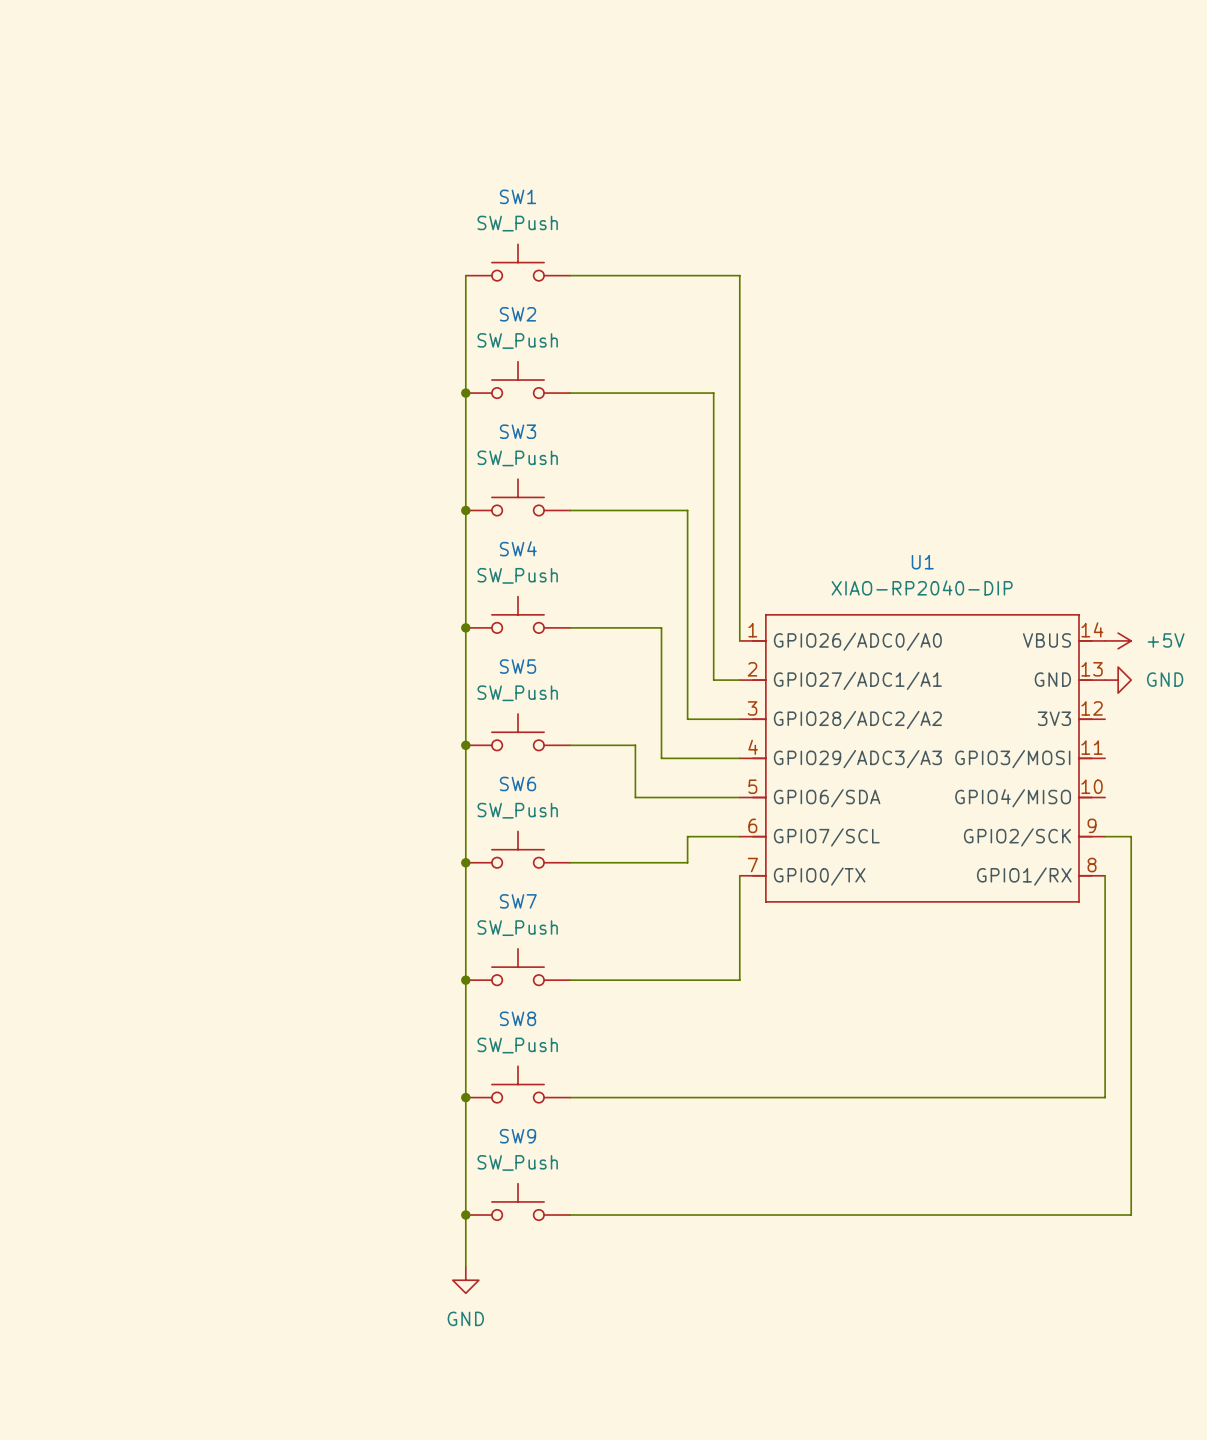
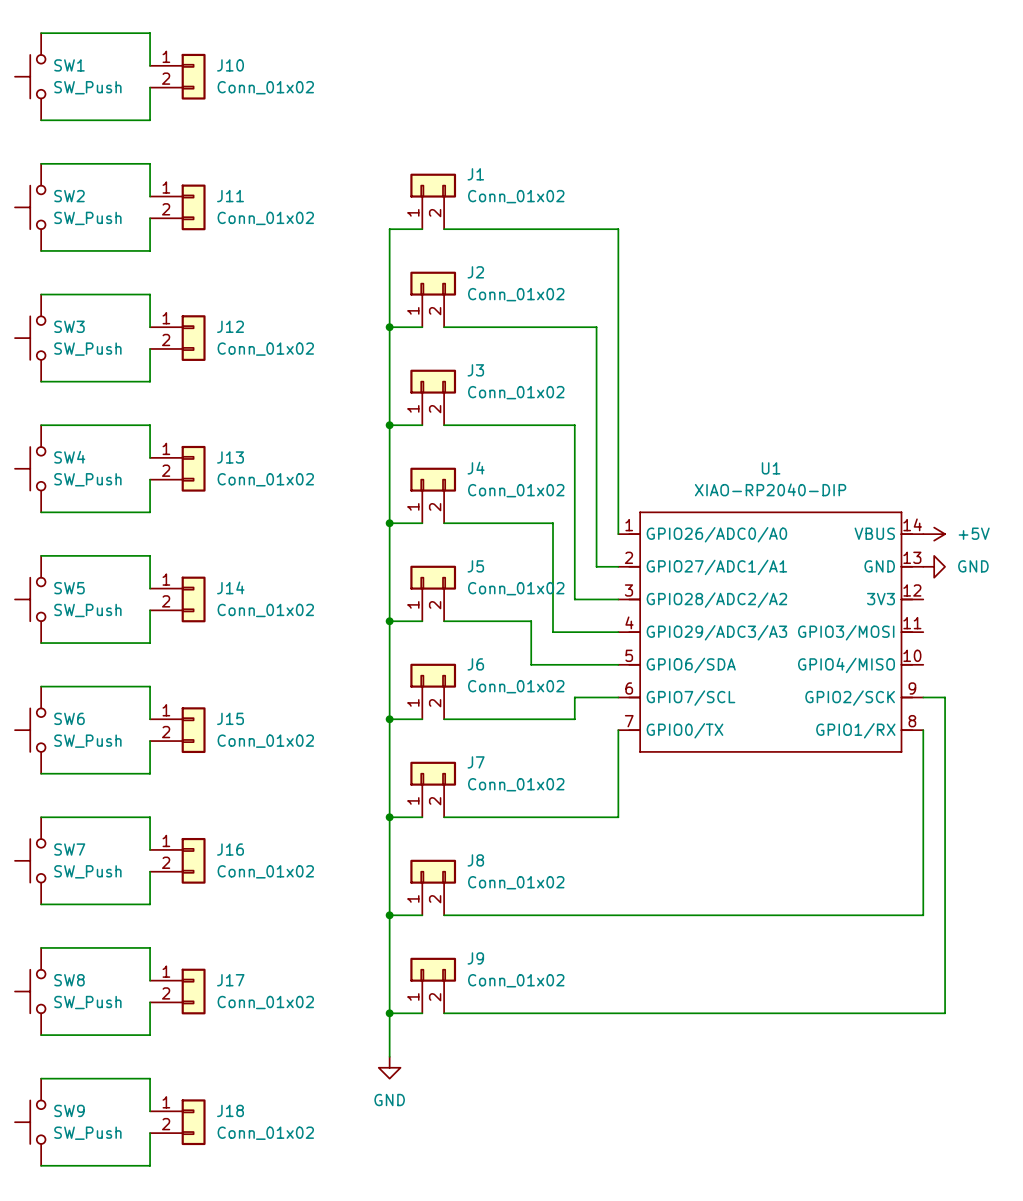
wire: none -> (41, 33) (150, 33) (150, 65)
J10: none -> Conn_01x02 (177, 76)
wire: none -> (150, 87) (150, 120) (41, 120)
SW1 name position: SW1 (517, 196) -> SW1 (69, 65)
wire: none -> (41, 163) (150, 163) (150, 196)
SW1 value position: SW_Push (517, 223) -> SW_Push (87, 87)
J1: none -> Conn_01x02 (433, 201)
J11: none -> Conn_01x02 (177, 207)
wire: none -> (150, 218) (150, 250) (41, 250)
SW1 rotation: 0° (517, 262) -> 90° counterclockwise (30, 76)
SW1 position: (517, 262) -> (30, 76)
SW2 name position: SW2 (517, 314) -> SW2 (69, 196)
SW2 value position: SW_Push (517, 341) -> SW_Push (87, 218)
wire: none -> (41, 294) (150, 294) (150, 327)
J2: none -> Conn_01x02 (433, 299)
SW2 rotation: 0° (517, 380) -> 90° counterclockwise (30, 207)
SW2 position: (517, 380) -> (30, 207)
J12: none -> Conn_01x02 (177, 338)
wire: none -> (150, 348) (150, 381) (41, 381)
SW3 name position: SW3 (517, 431) -> SW3 (69, 326)
SW3 value position: SW_Push (517, 458) -> SW_Push (87, 349)
J3: none -> Conn_01x02 (433, 397)
SW3 rotation: 0° (517, 497) -> 90° counterclockwise (30, 338)
SW3 position: (517, 497) -> (30, 338)
wire: none -> (41, 425) (150, 425) (150, 457)
SW4 name position: SW4 (518, 548) -> SW4 (69, 457)
J13: none -> Conn_01x02 (177, 468)
wire: none -> (150, 479) (150, 512) (41, 512)
SW4 value position: SW_Push (517, 575) -> SW_Push (87, 479)
J4: none -> Conn_01x02 (433, 495)
SW4 rotation: 0° (517, 614) -> 90° counterclockwise (30, 468)
SW4 position: (517, 614) -> (30, 468)
SW5 name position: SW5 (517, 666) -> SW5 (69, 588)
wire: none -> (41, 555) (150, 555) (150, 588)
SW5 value position: SW_Push (517, 693) -> SW_Push (87, 610)
J5: none -> Conn_01x02 (433, 593)
J14: none -> Conn_01x02 (177, 599)
wire: none -> (150, 610) (150, 643) (41, 643)
SW5 rotation: 0° (517, 732) -> 90° counterclockwise (30, 599)
SW5 position: (517, 732) -> (30, 599)
SW6 name position: SW6 (517, 783) -> SW6 (69, 718)
SW6 value position: SW_Push (517, 810) -> SW_Push (87, 741)
wire: none -> (41, 686) (150, 686) (150, 719)
J6: none -> Conn_01x02 (433, 691)
SW6 rotation: 0° (517, 849) -> 90° counterclockwise (30, 730)
SW6 position: (517, 849) -> (30, 730)
J15: none -> Conn_01x02 (177, 730)
wire: none -> (150, 741) (150, 773) (41, 773)
SW7 name position: SW7 (518, 901) -> SW7 (69, 849)
SW7 value position: SW_Push (517, 928) -> SW_Push (87, 871)
J7: none -> Conn_01x02 (433, 789)
SW7 rotation: 0° (517, 967) -> 90° counterclockwise (30, 860)
SW7 position: (517, 967) -> (30, 860)
wire: none -> (41, 817) (150, 817) (150, 849)
SW8 name position: SW8 (517, 1018) -> SW8 (69, 980)
J16: none -> Conn_01x02 (177, 860)
wire: none -> (150, 871) (150, 904) (41, 904)
SW8 value position: SW_Push (517, 1045) -> SW_Push (87, 1002)
J8: none -> Conn_01x02 (433, 887)
SW8 rotation: 0° (517, 1084) -> 90° counterclockwise (30, 991)
SW8 position: (517, 1084) -> (30, 991)
wire: none -> (41, 947) (150, 947) (150, 980)
SW9 name position: SW9 (517, 1136) -> SW9 (69, 1110)
SW9 value position: SW_Push (517, 1162) -> SW_Push (87, 1133)
J9: none -> Conn_01x02 (433, 985)
J17: none -> Conn_01x02 (177, 991)
wire: none -> (150, 1002) (150, 1035) (41, 1035)
SW9 rotation: 0° (517, 1201) -> 90° counterclockwise (30, 1122)
SW9 position: (517, 1201) -> (30, 1122)
wire: none -> (41, 1078) (150, 1078) (150, 1111)
J18: none -> Conn_01x02 (177, 1122)
wire: none -> (150, 1133) (150, 1165) (41, 1165)

